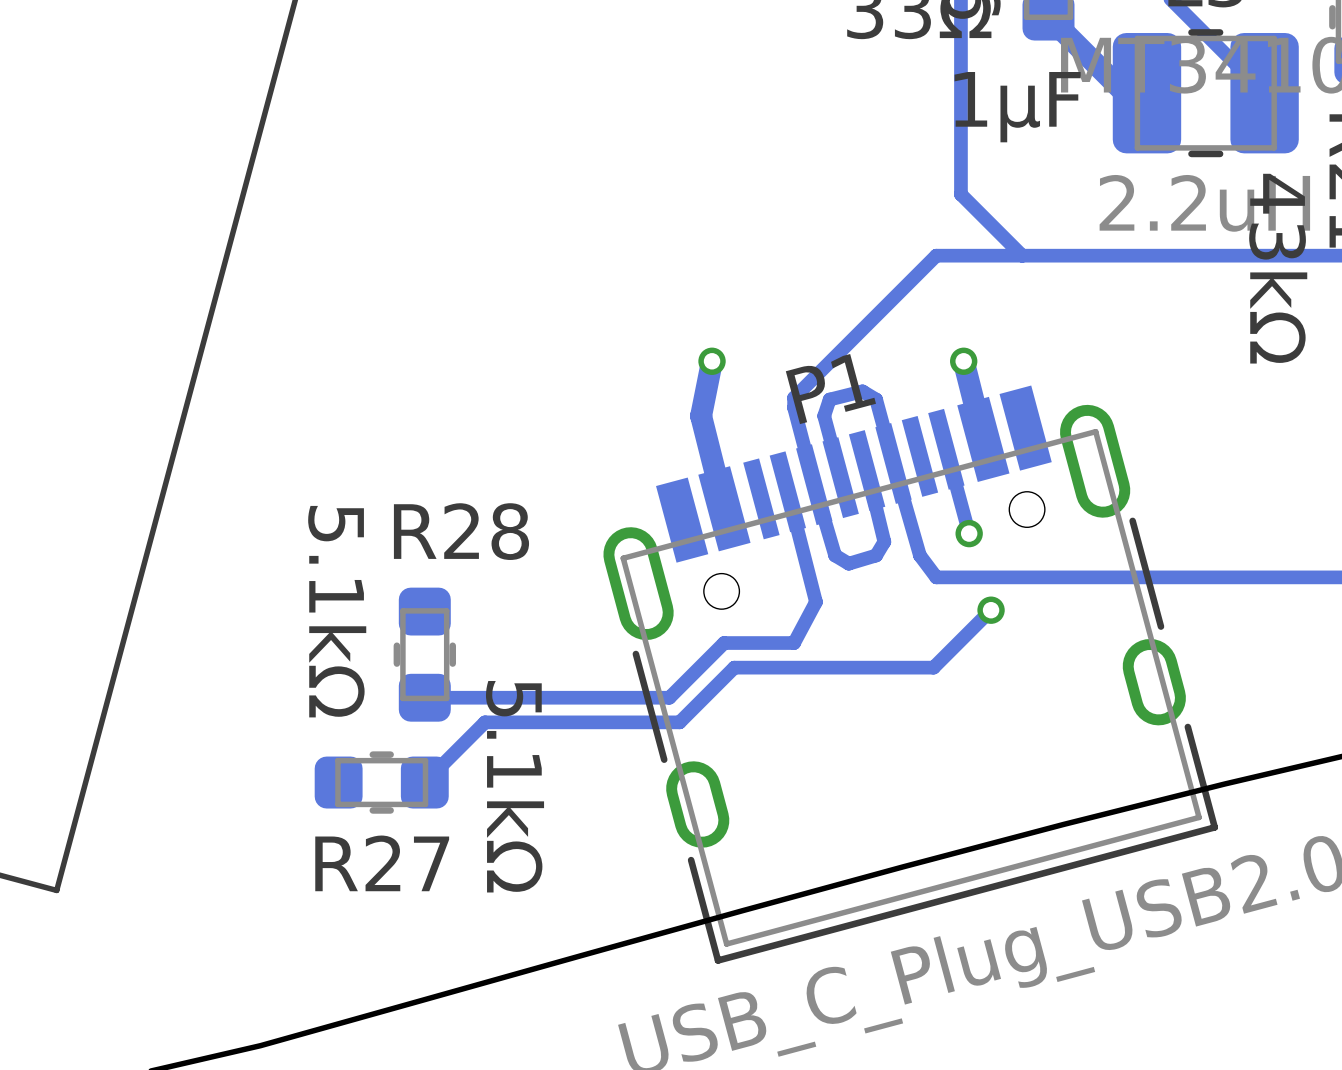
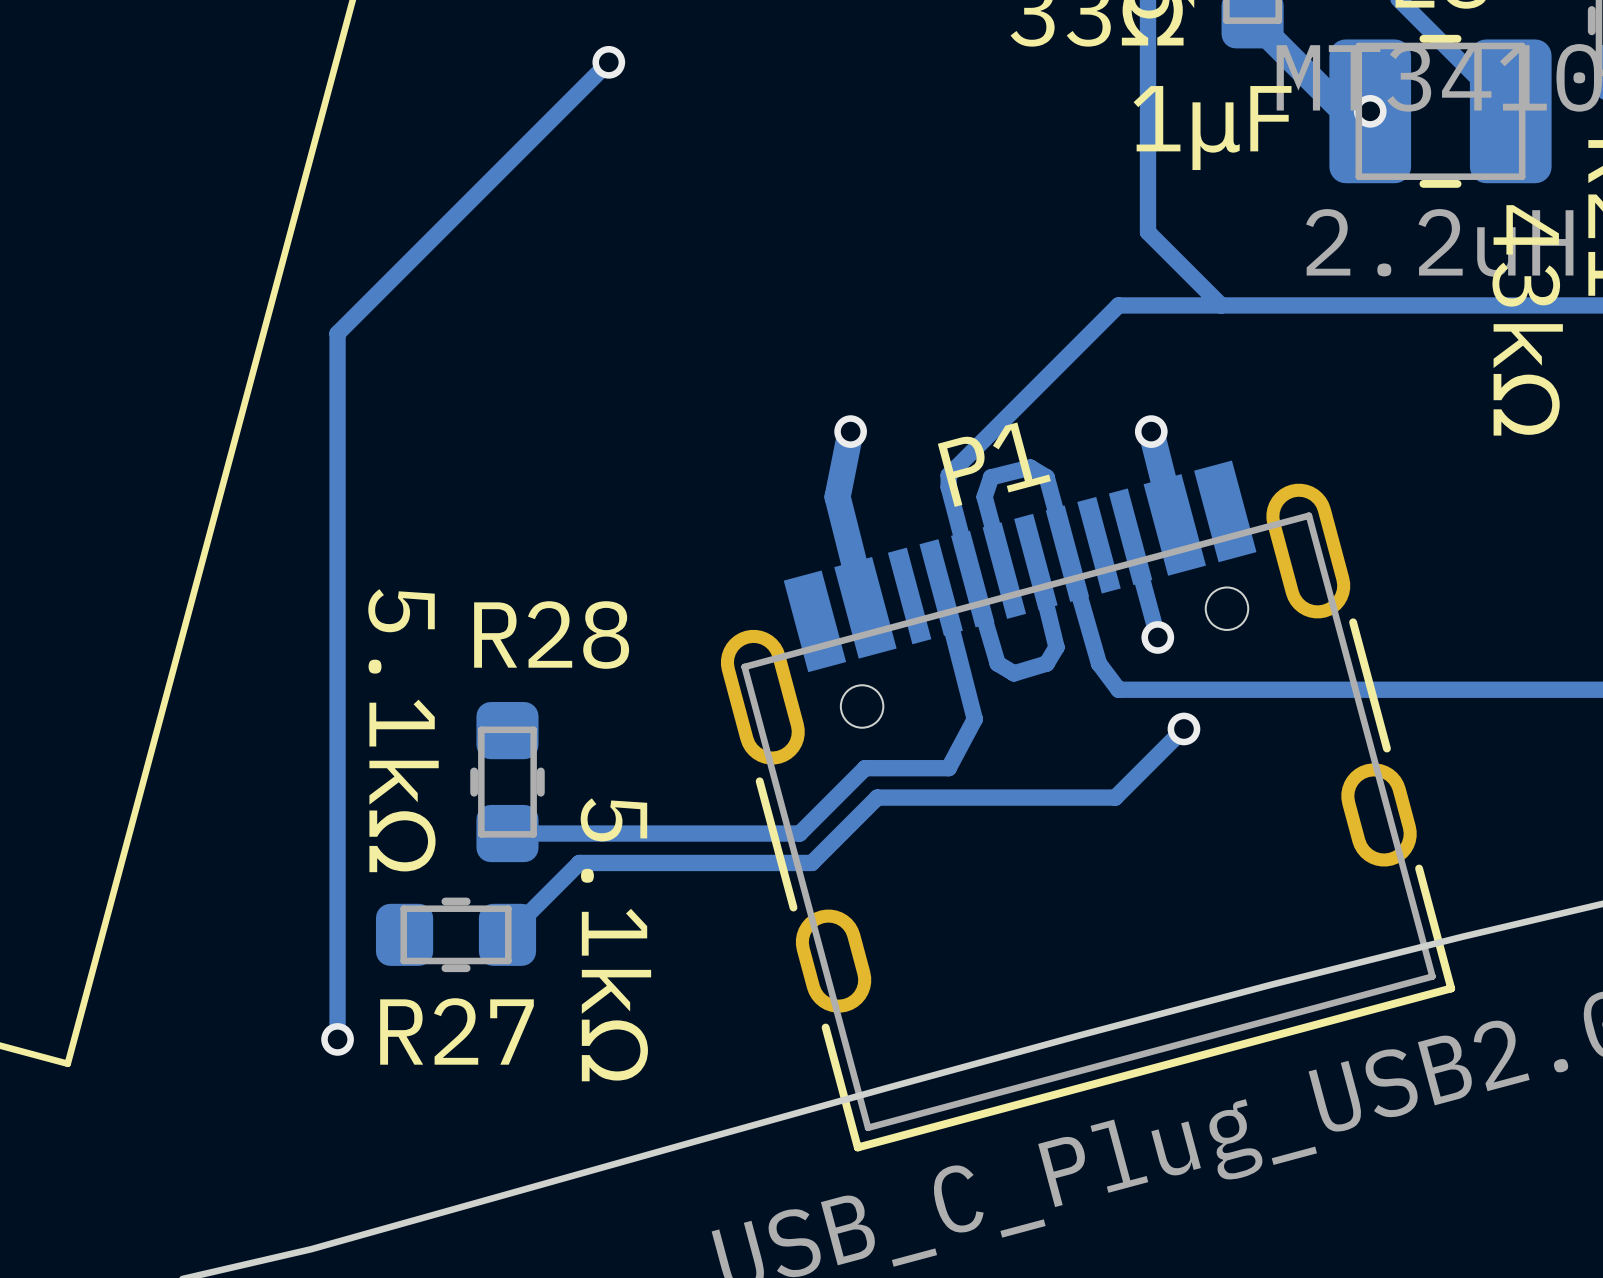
track: none -> (608, 62) (337, 333) (337, 1039)
via: none -> (608, 62)
via: none -> (1370, 111)
via: none -> (337, 1039)

